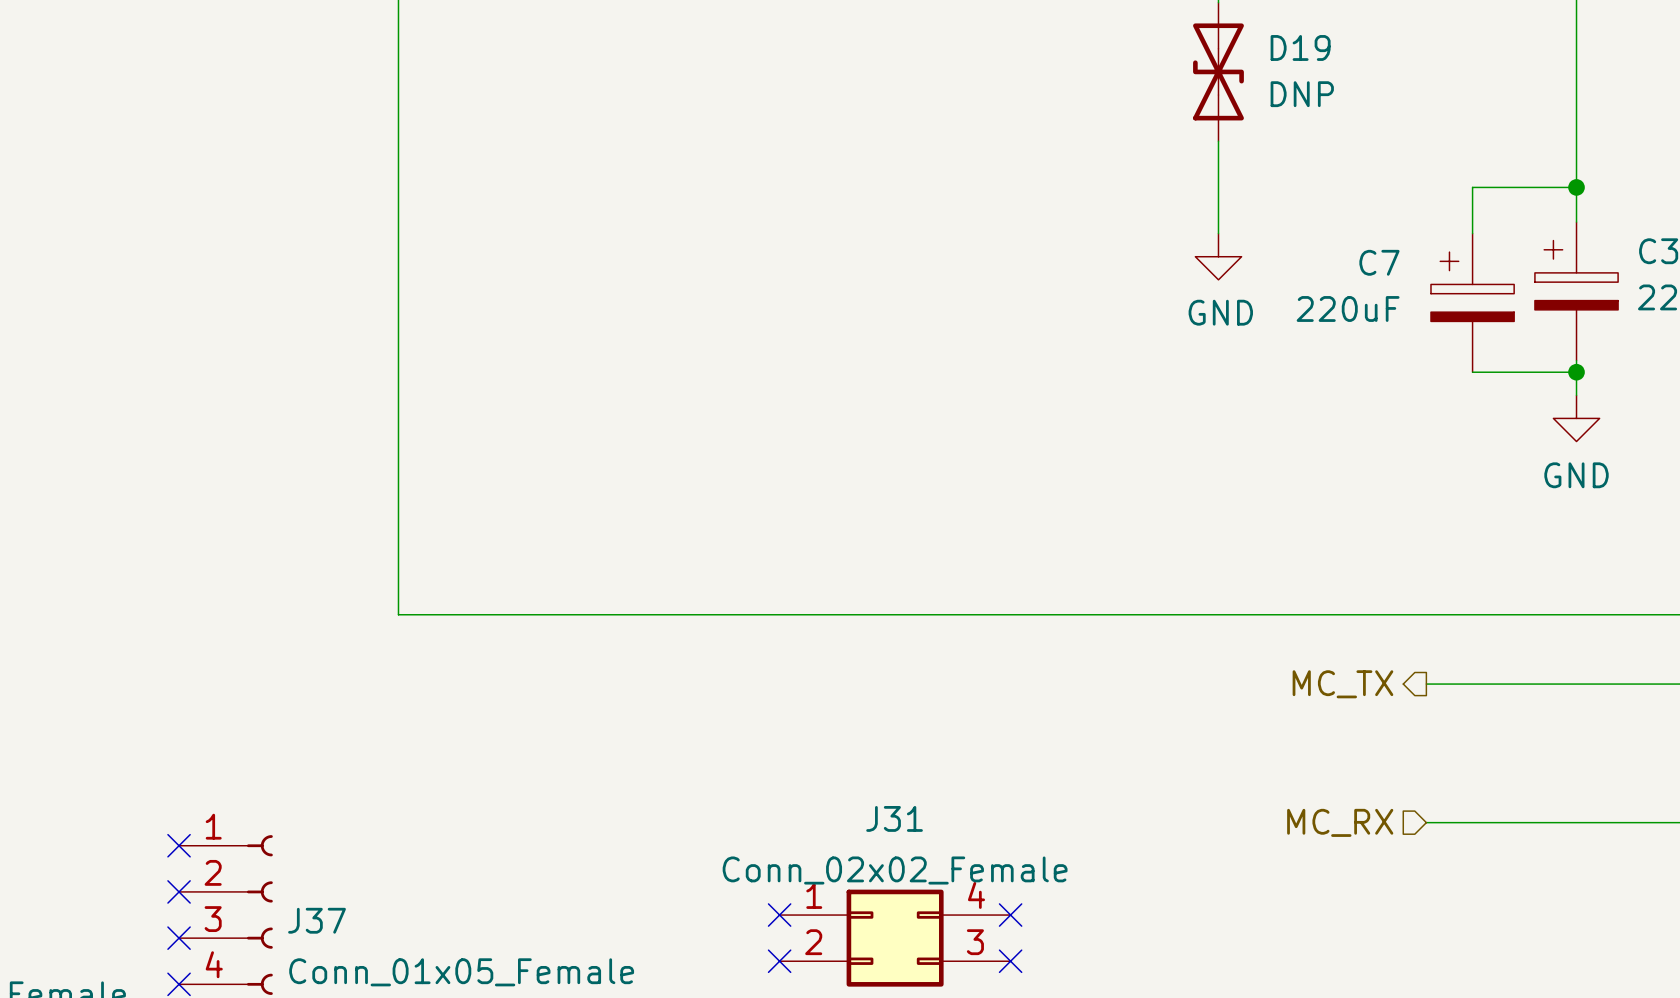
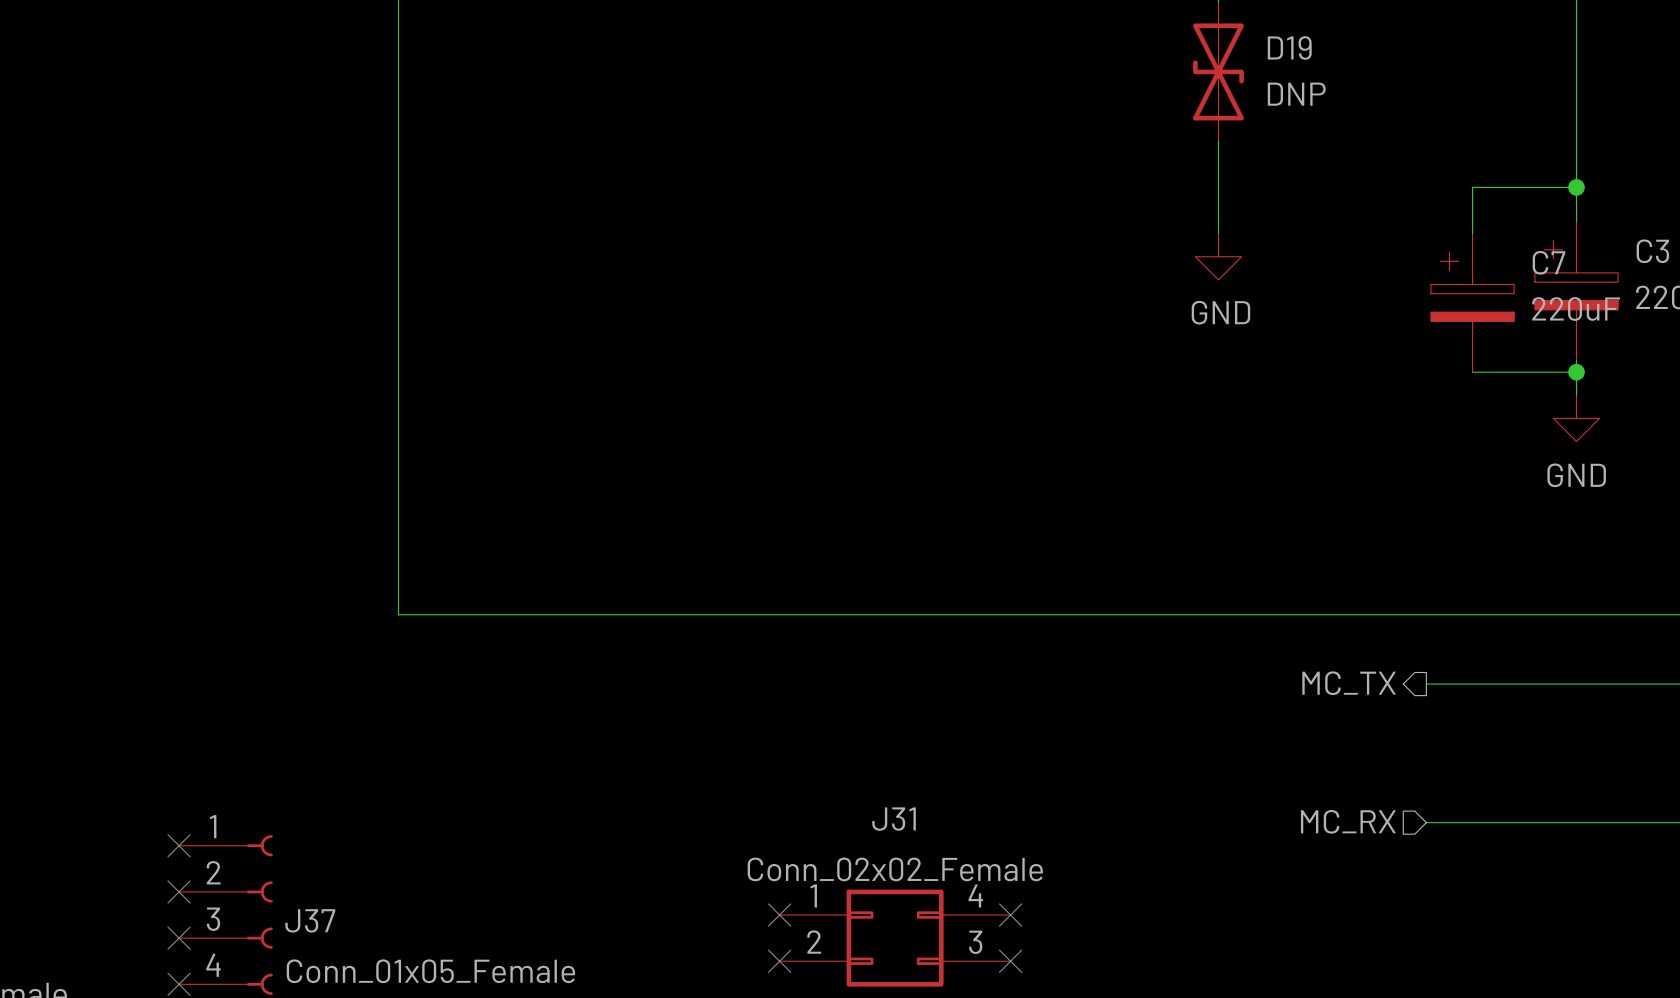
C7 name position: C7 (1379, 262) -> C7 (1548, 262)
C7 value position: 220uF (1348, 308) -> 220uF (1576, 309)

